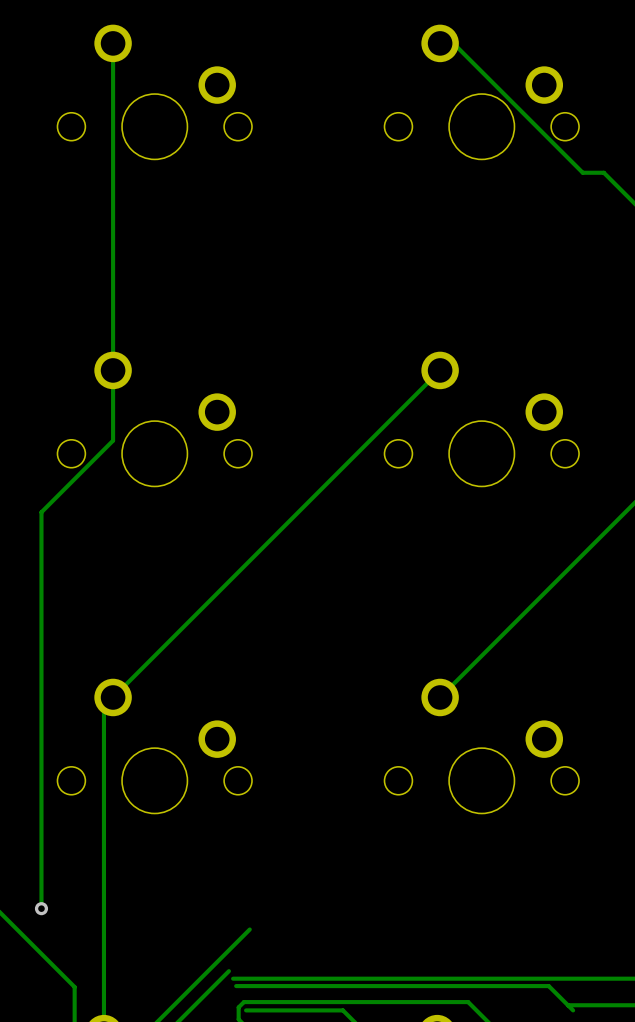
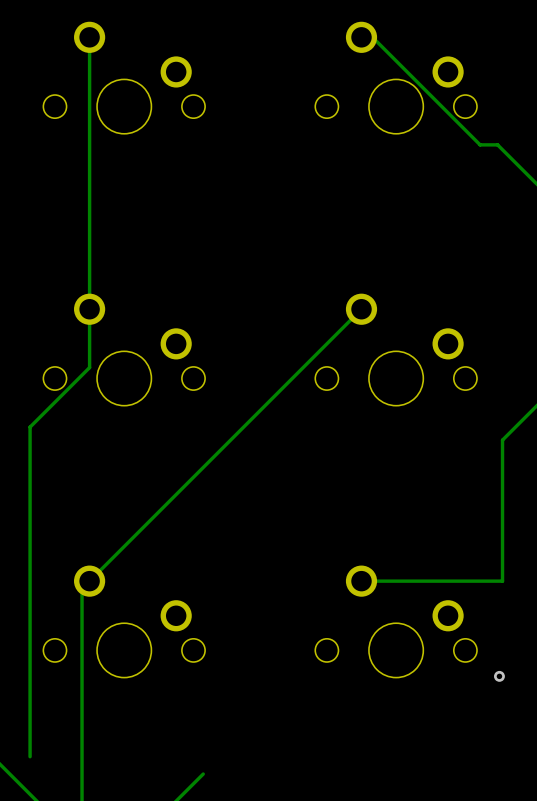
track: (609, 527) (440, 697) -> (502, 440) (502, 581) (361, 581)
via: none -> (499, 676)
via: (41, 908) -> none

